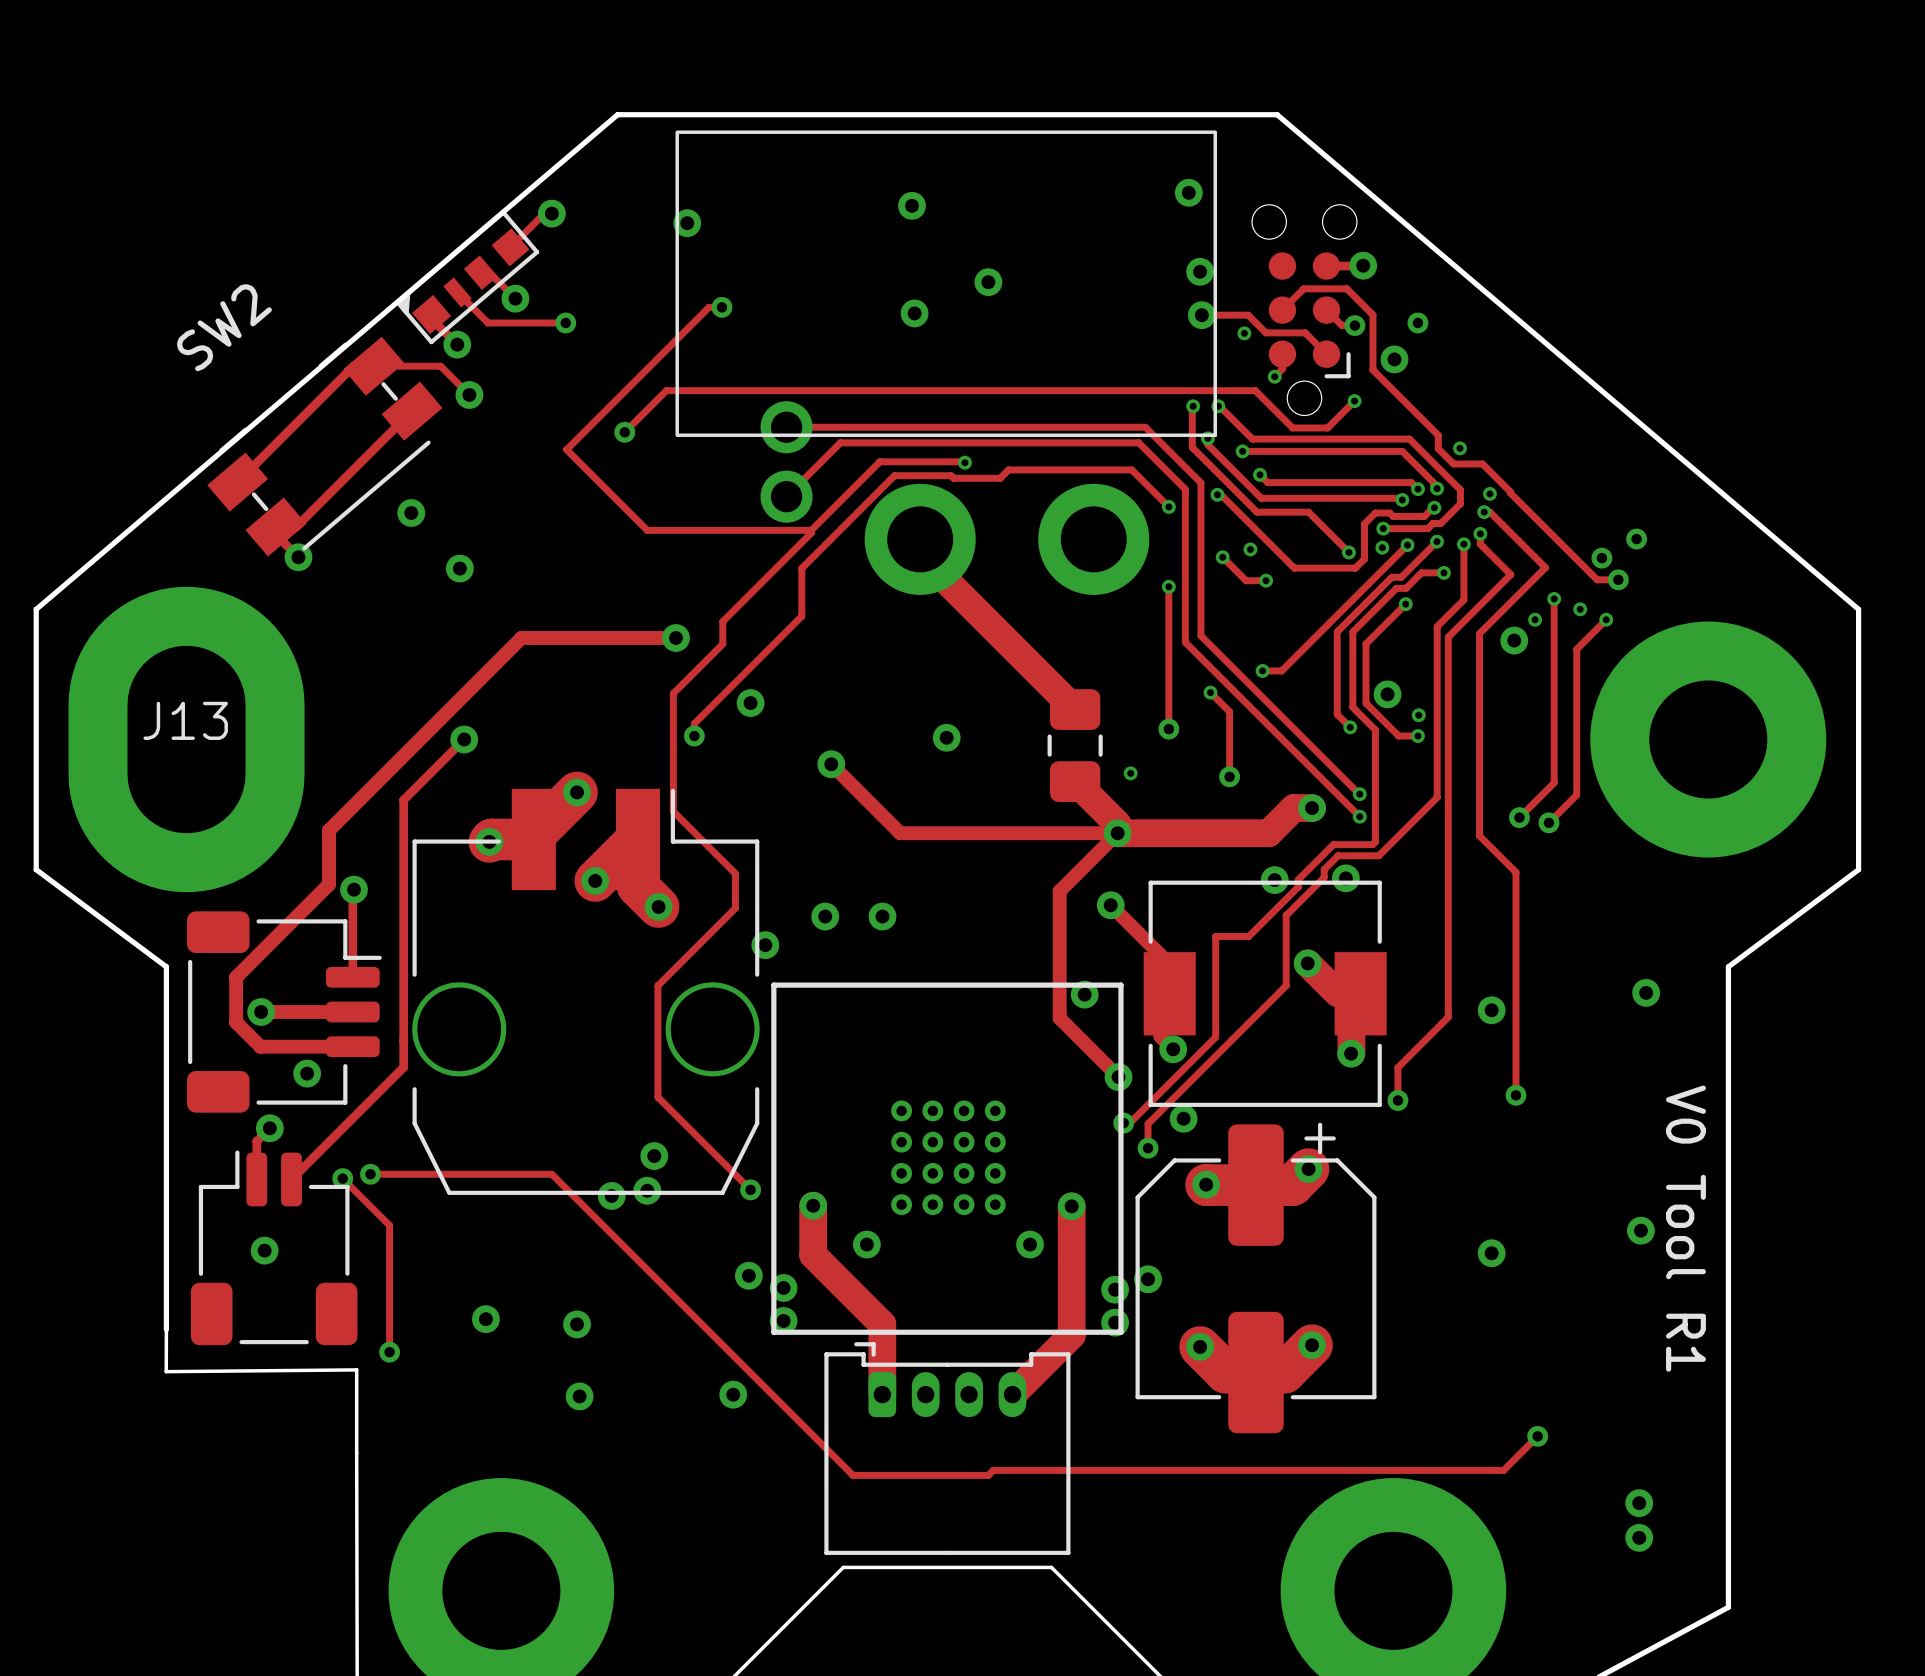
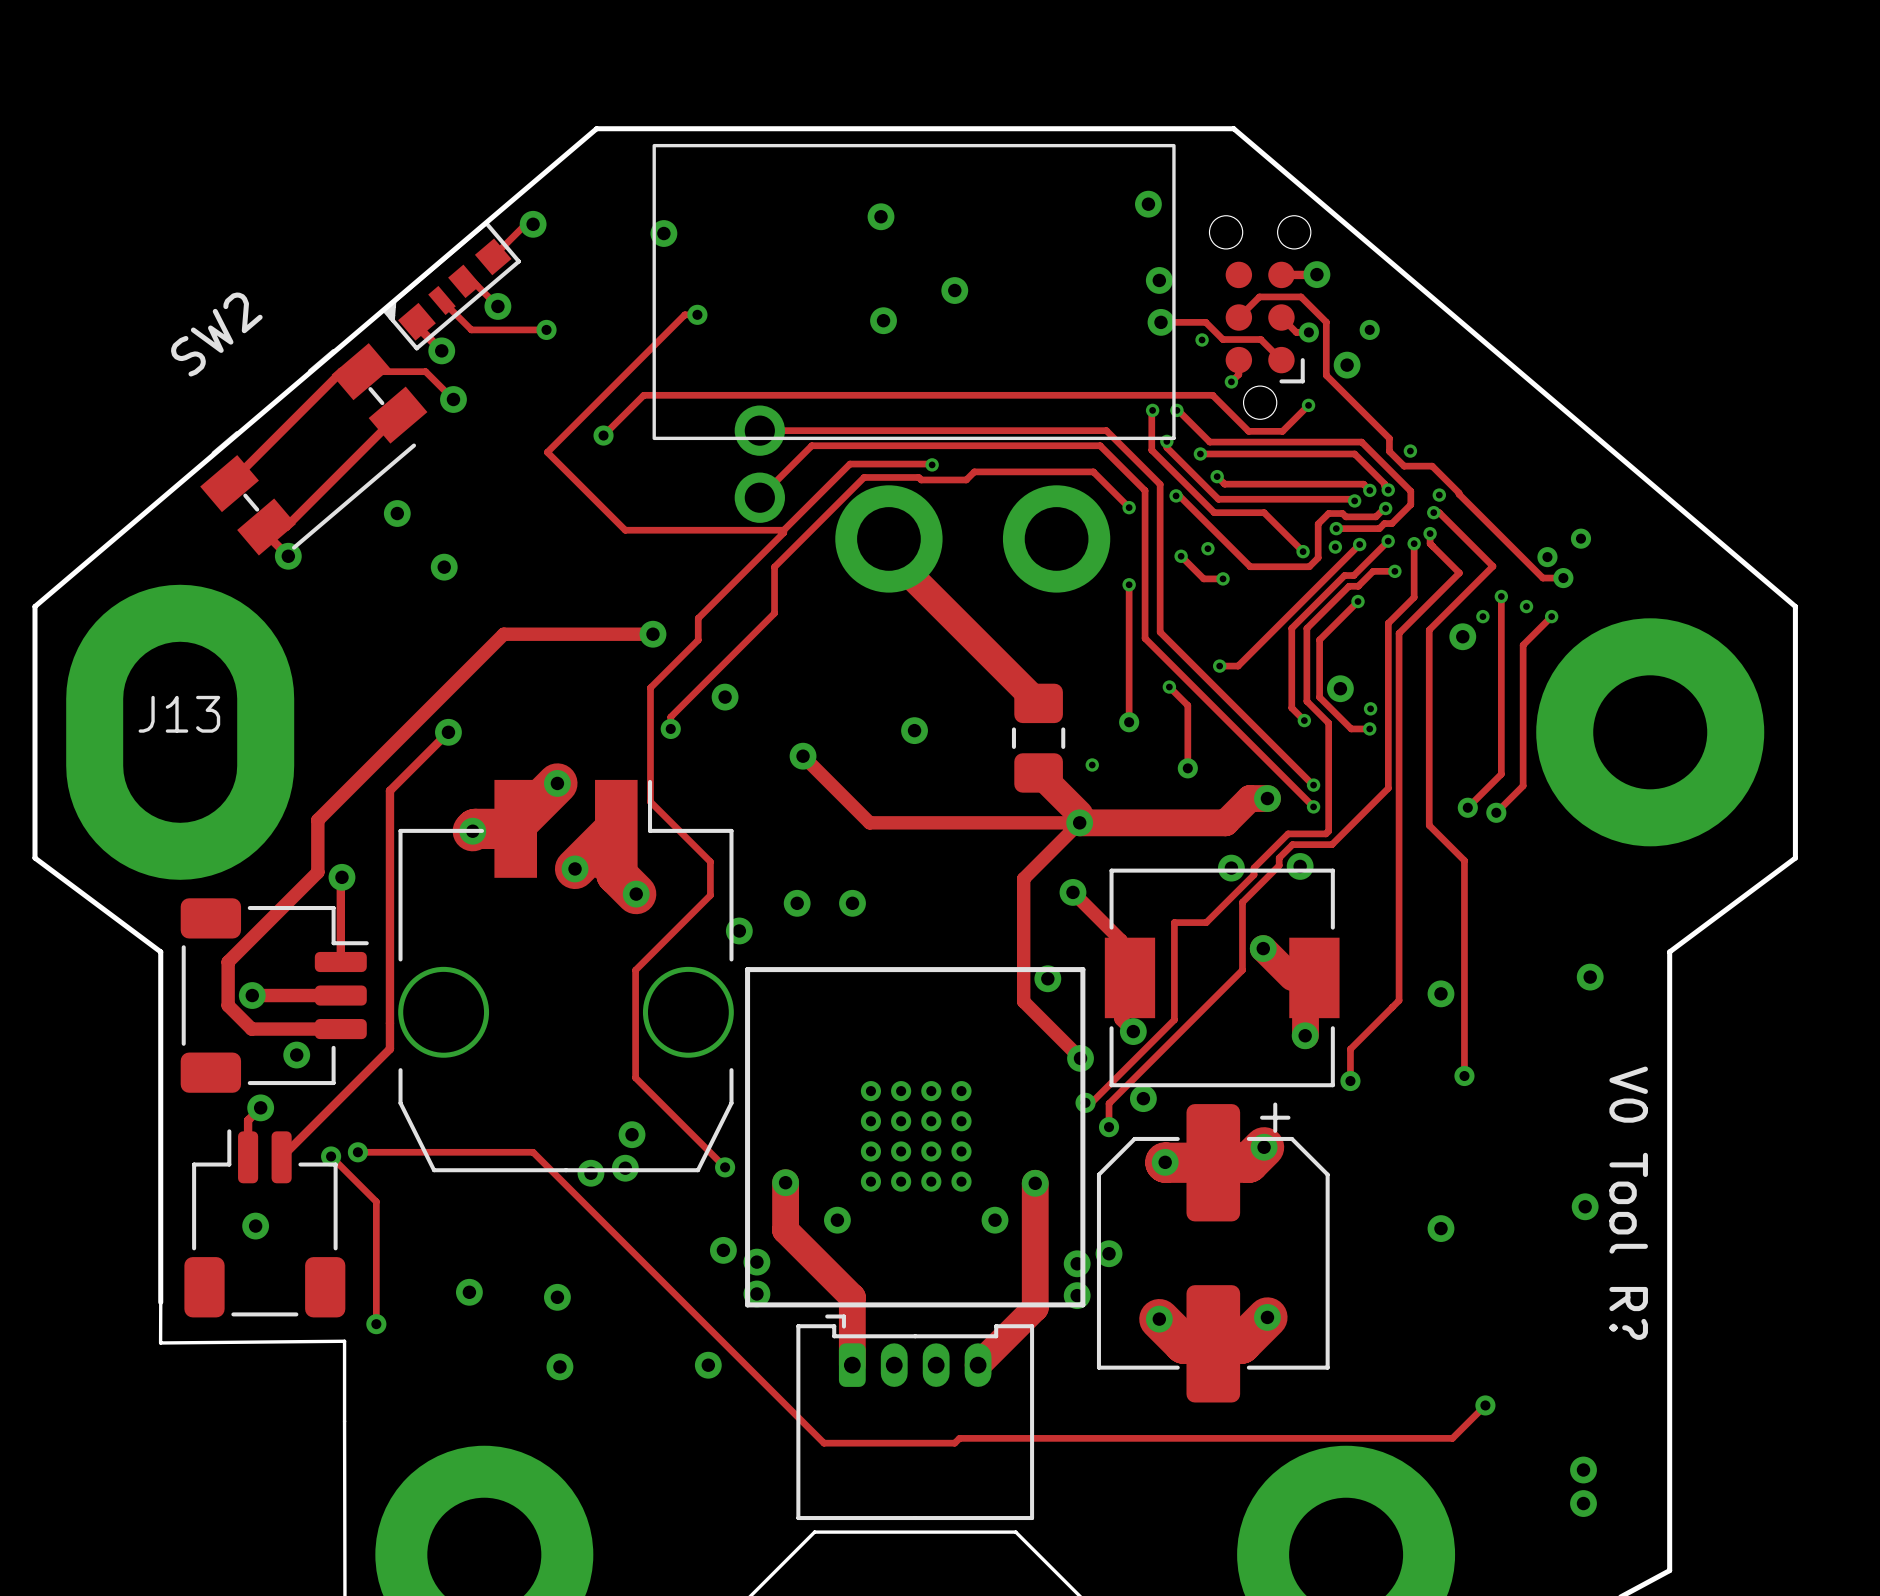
text: V0 Tool R1 (1685, 1228) -> V0 Tool R? (1628, 1203)

